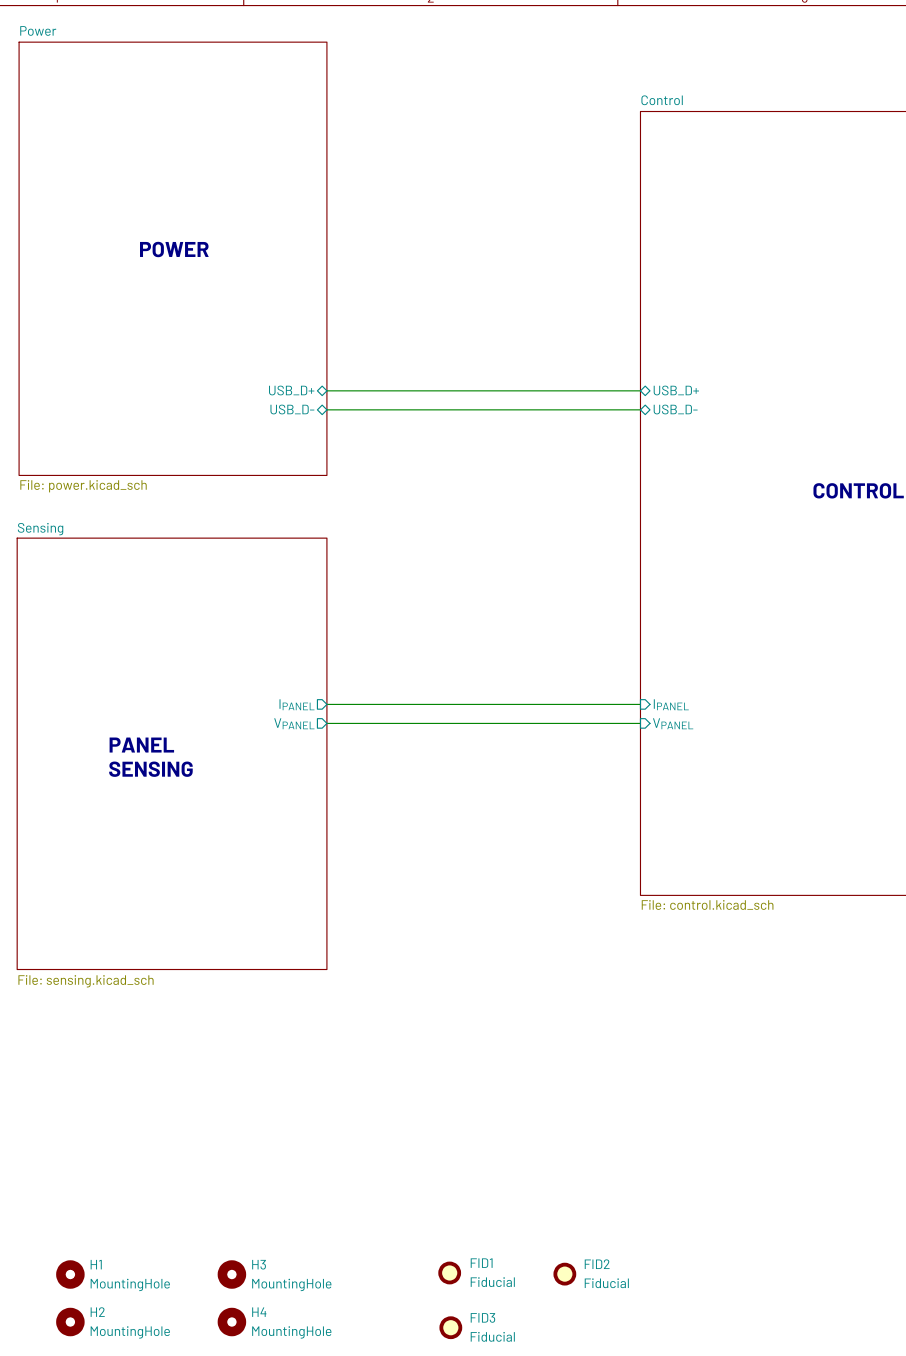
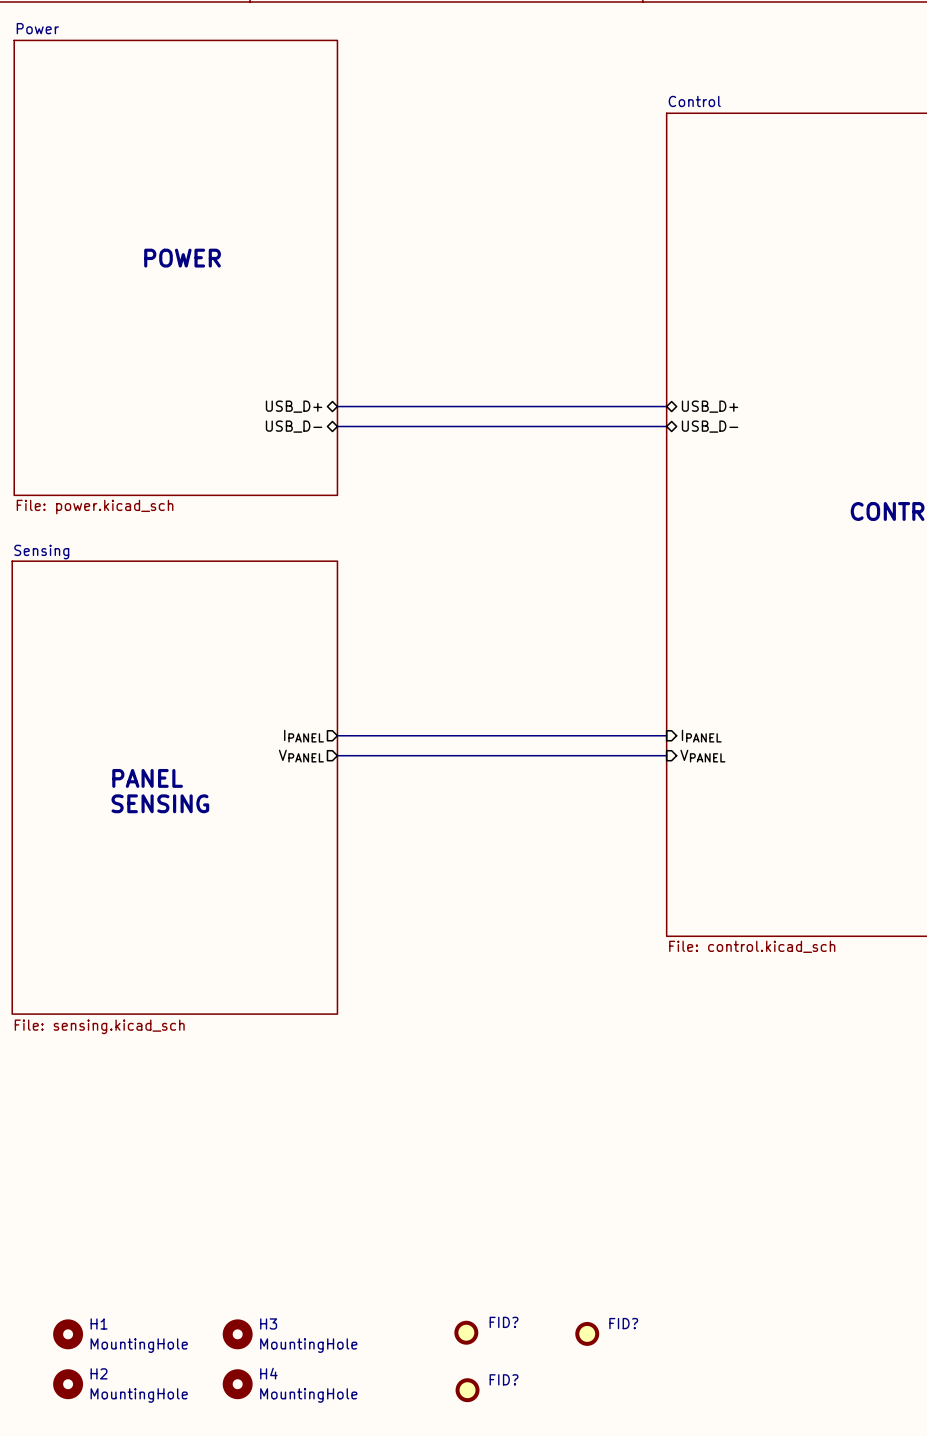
FID1 name: FID1 (481, 1263) -> FID? (504, 1322)
FID2 name: FID2 (597, 1264) -> FID? (623, 1323)
FID1 value: Fiducial (492, 1282) -> none
FID2 value: Fiducial (606, 1283) -> none
FID3 name: FID3 (482, 1317) -> FID? (504, 1379)
FID3 value: Fiducial (492, 1336) -> none

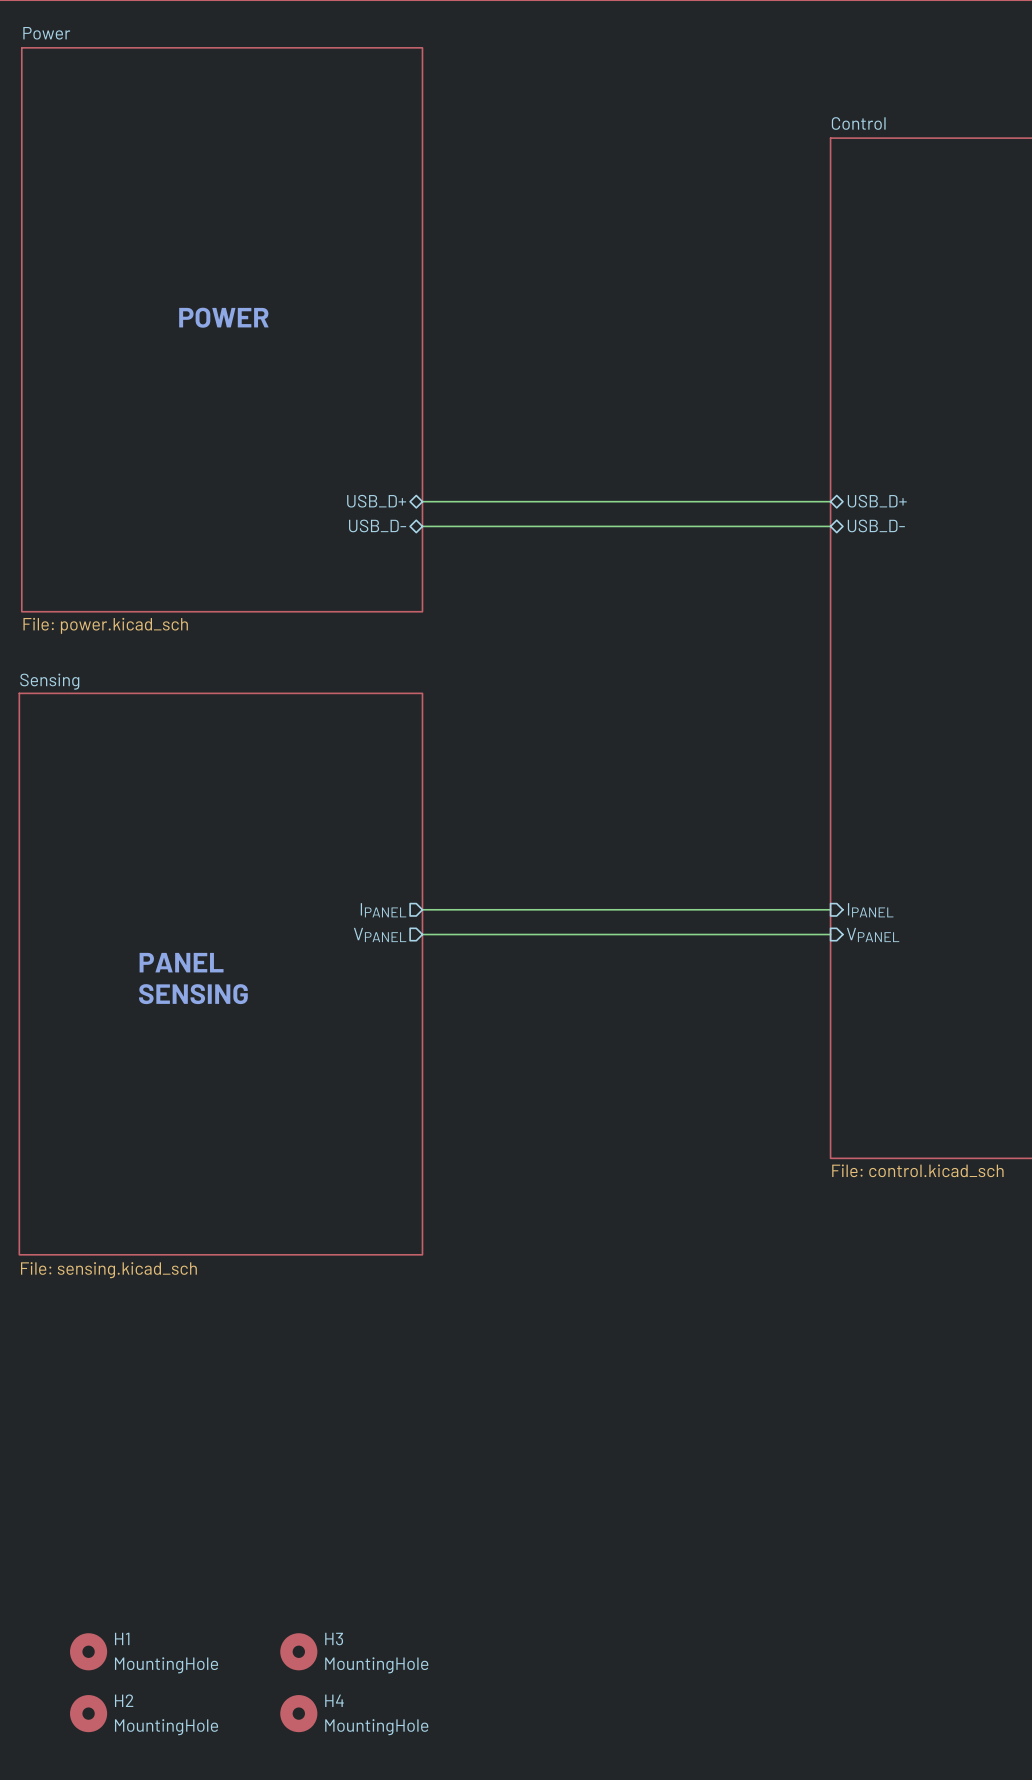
FID?: (466, 1332) -> none
FID?: (587, 1333) -> none
FID?: (467, 1390) -> none

